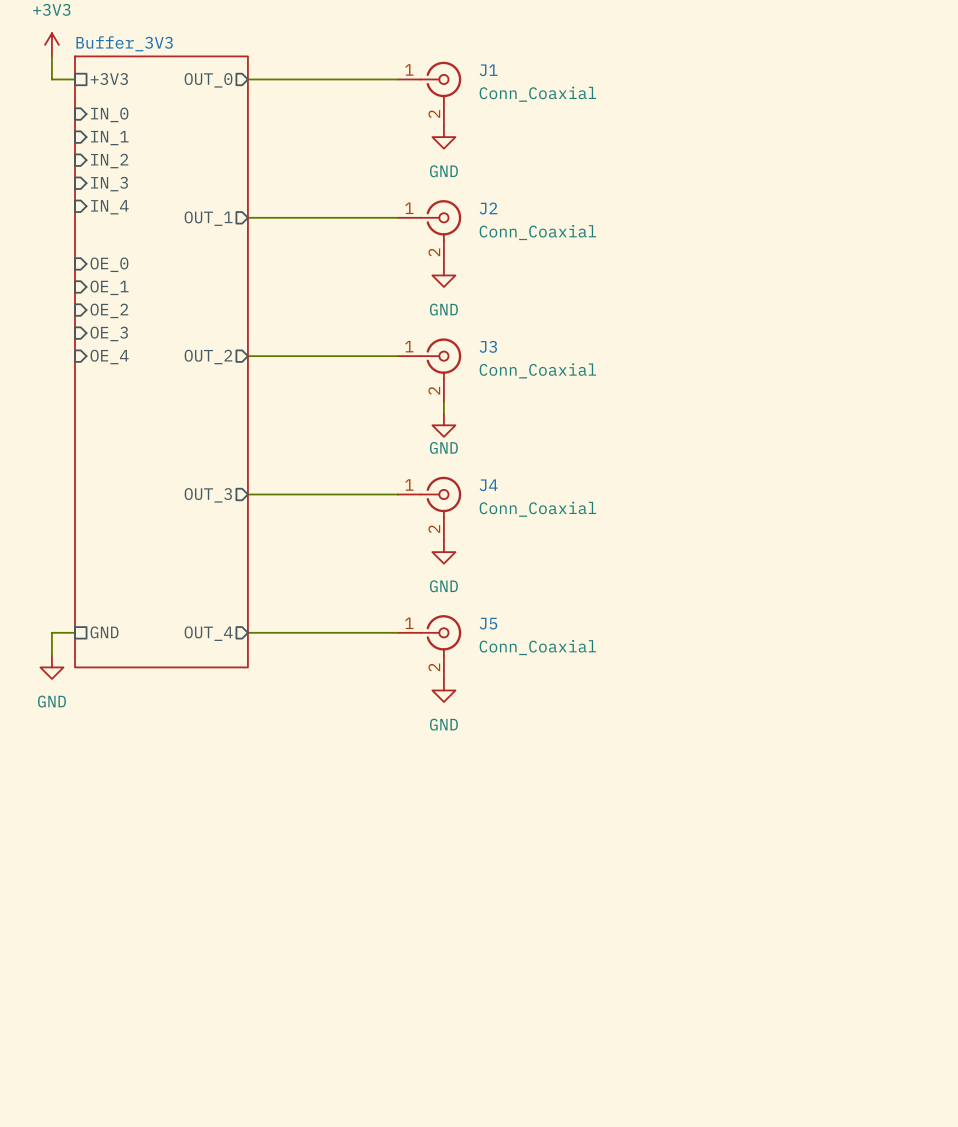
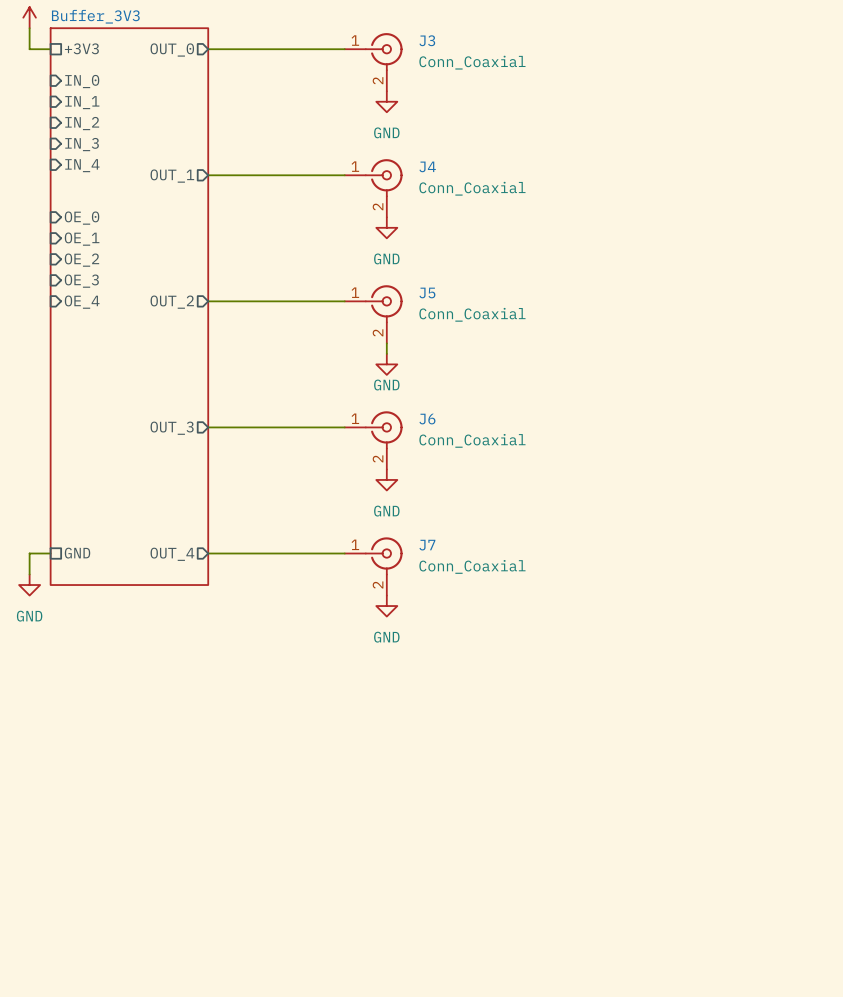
J1 name: J1 (488, 70) -> J3 (427, 40)
J2 name: J2 (488, 208) -> J4 (427, 166)
J3 name: J3 (488, 346) -> J5 (427, 292)
J4 name: J4 (488, 485) -> J6 (427, 419)
J5 name: J5 (488, 623) -> J7 (427, 545)

